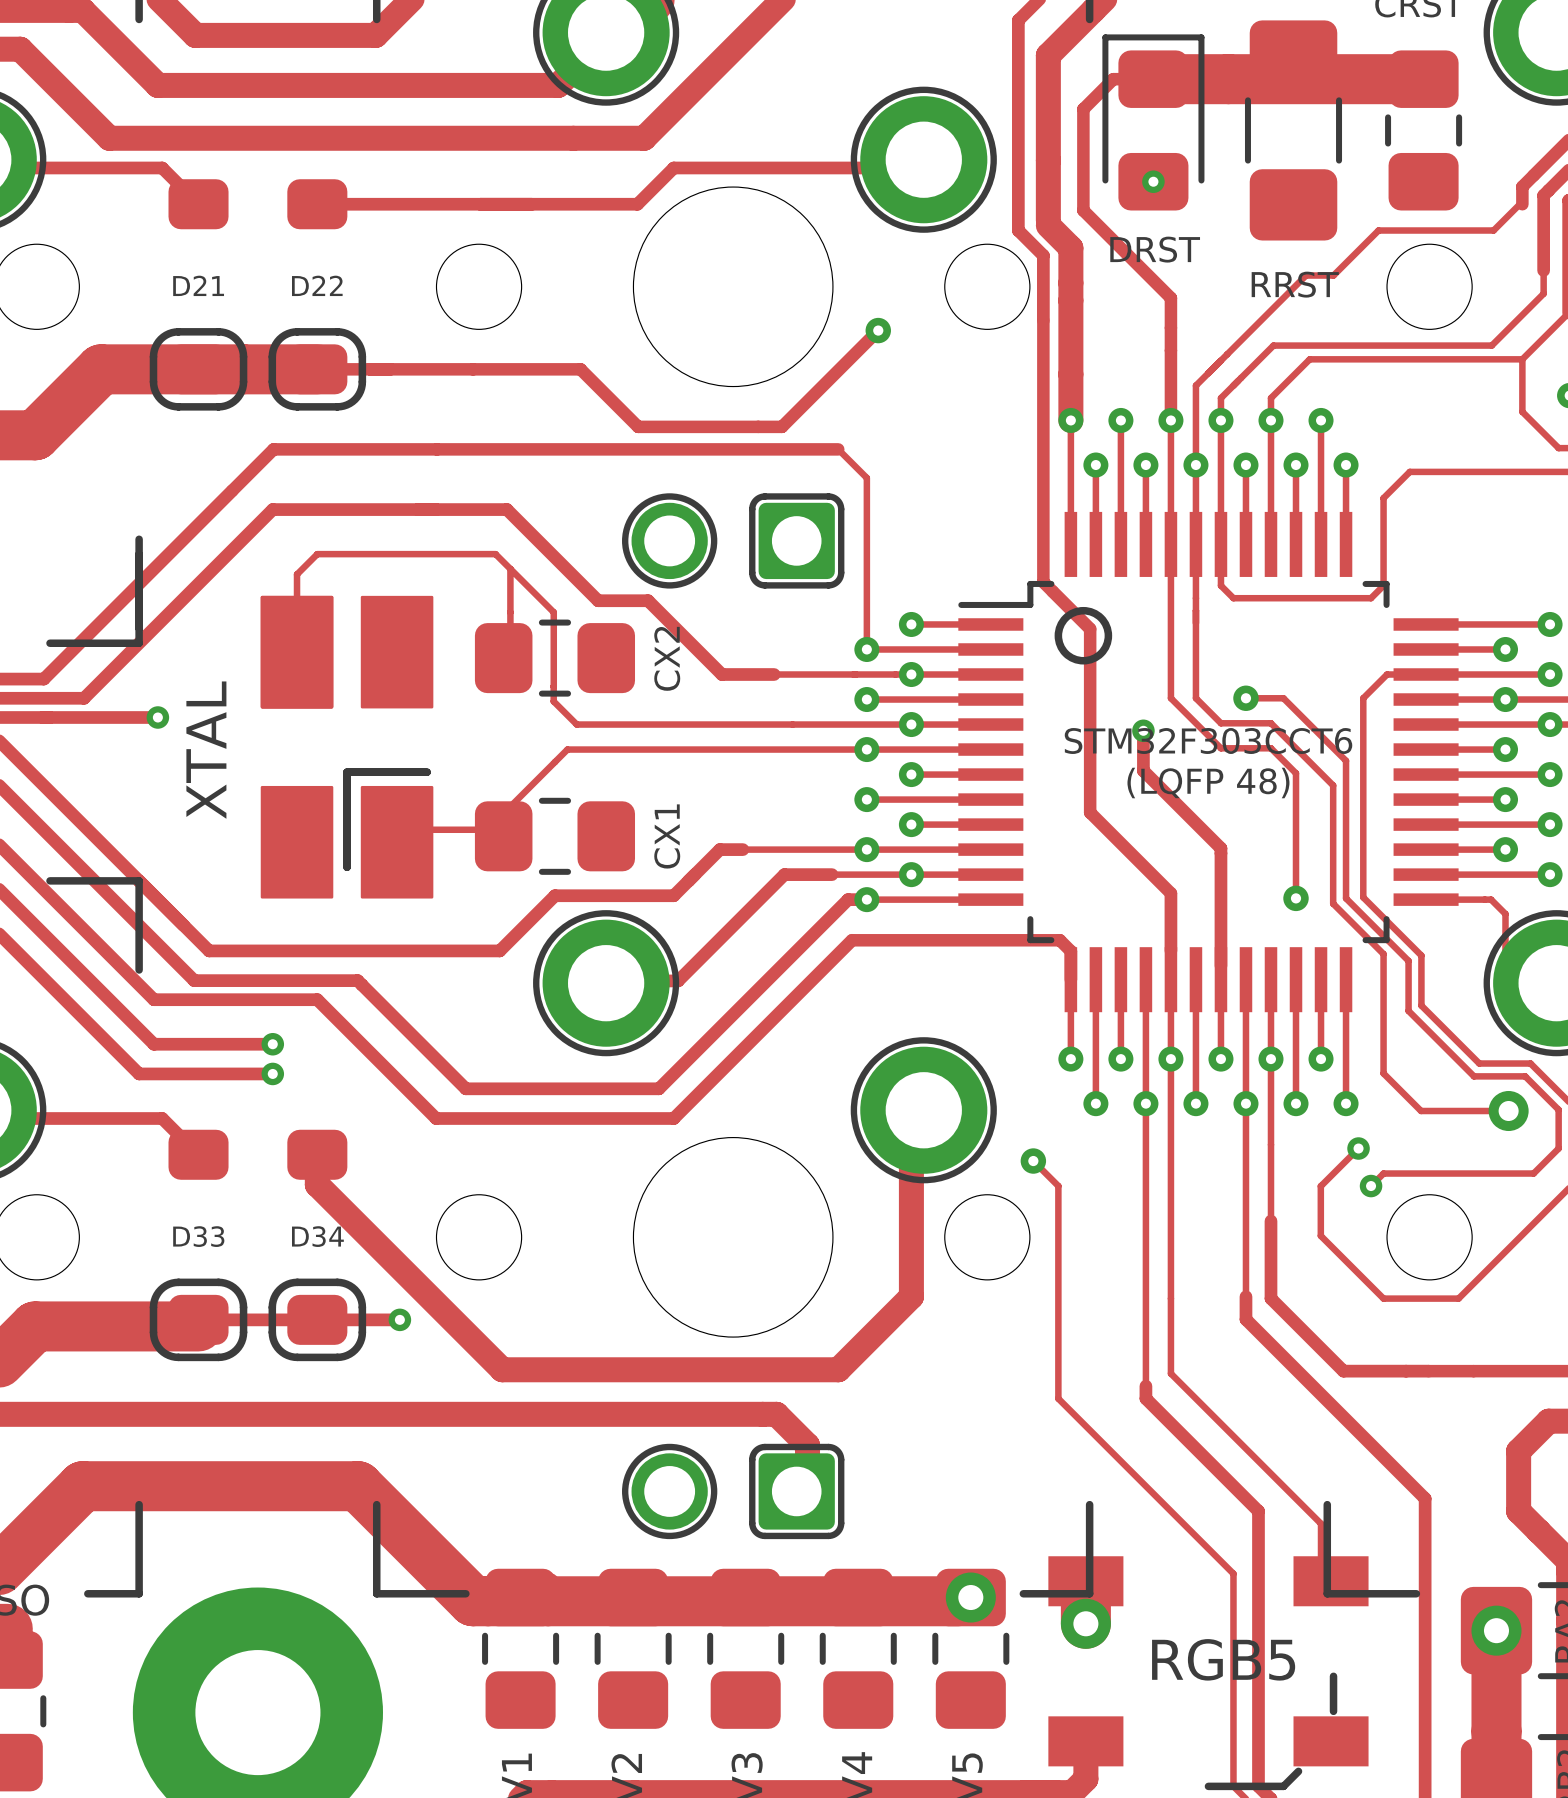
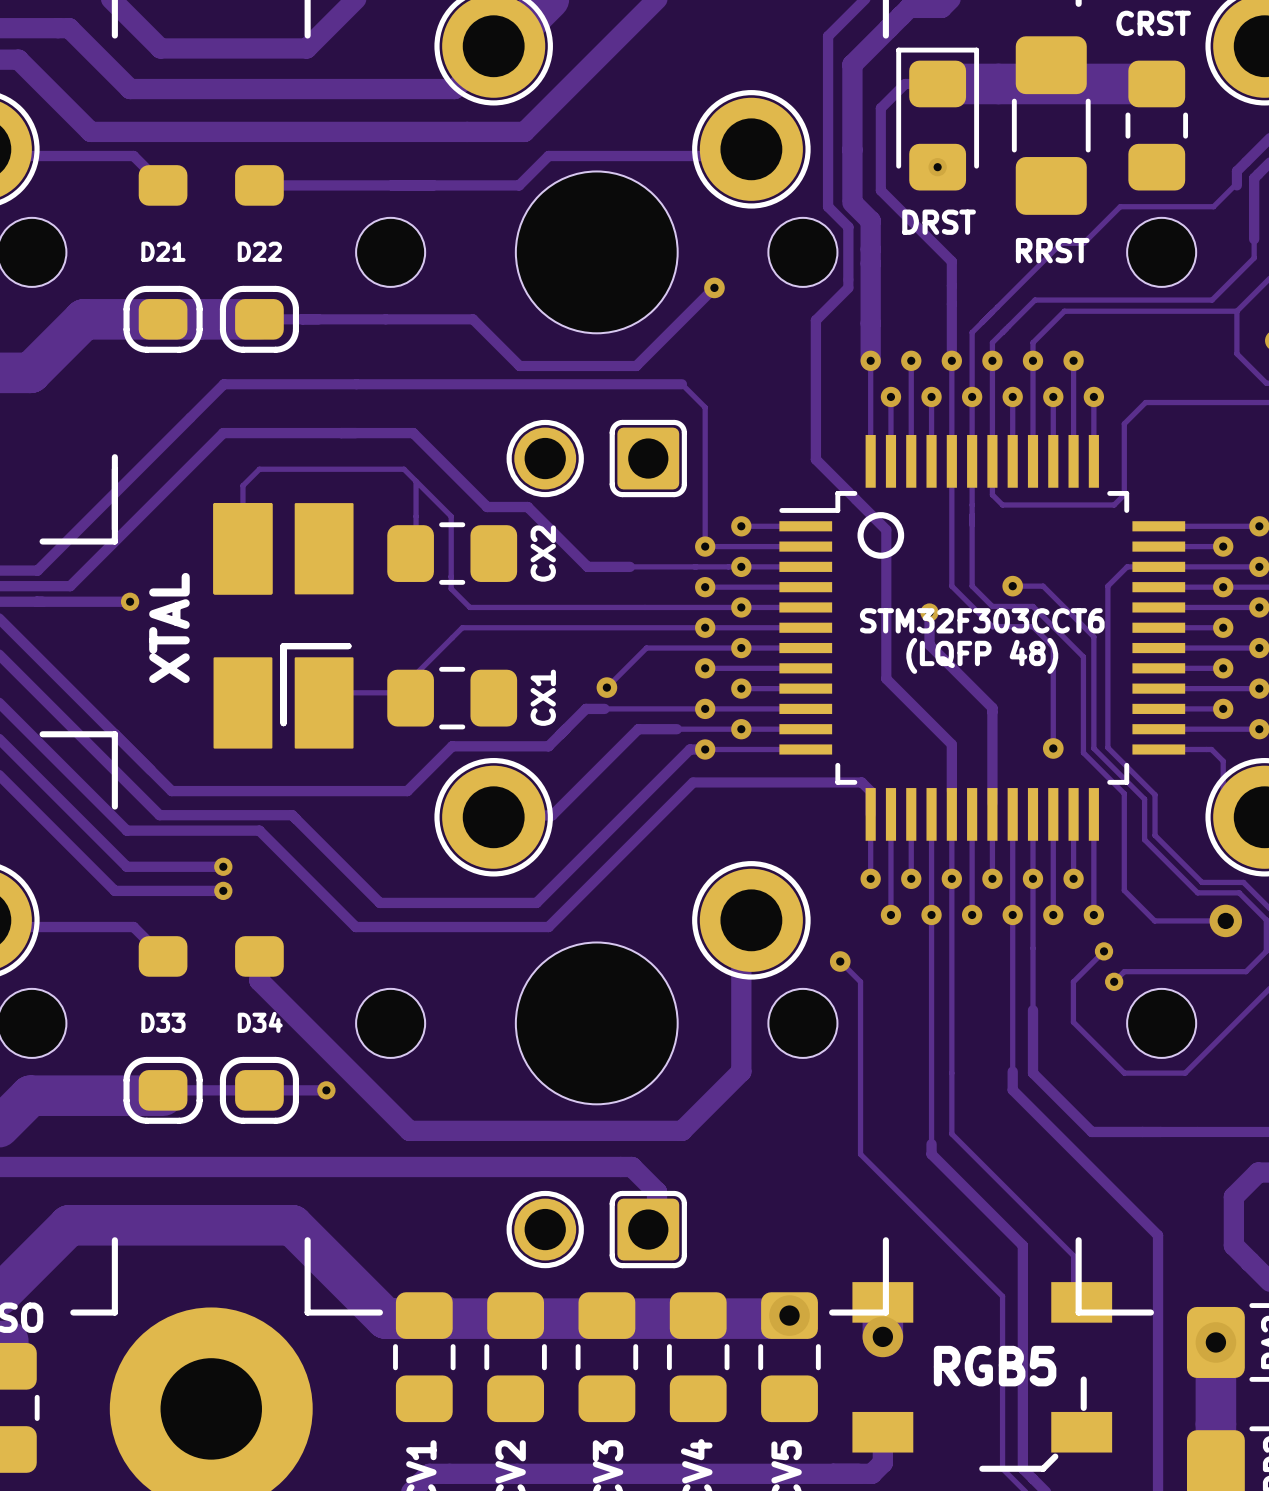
track: (1043, 330) (1043, 582) -> (848, 287) (815, 320) (815, 459) (848, 491)
track: none -> (741, 648) (646, 648) (606, 687)
via: none -> (606, 687)

